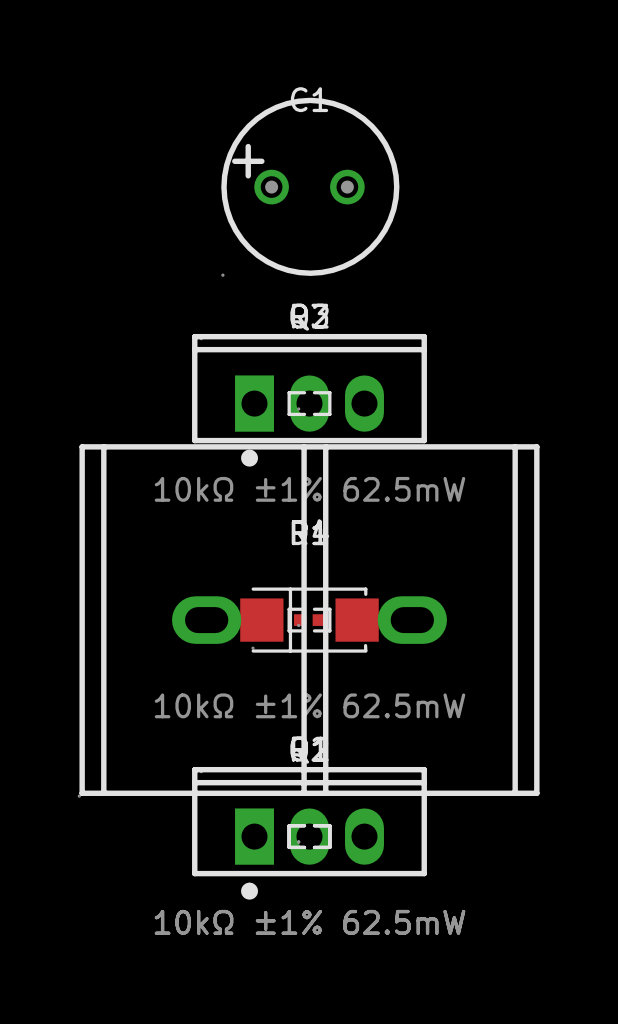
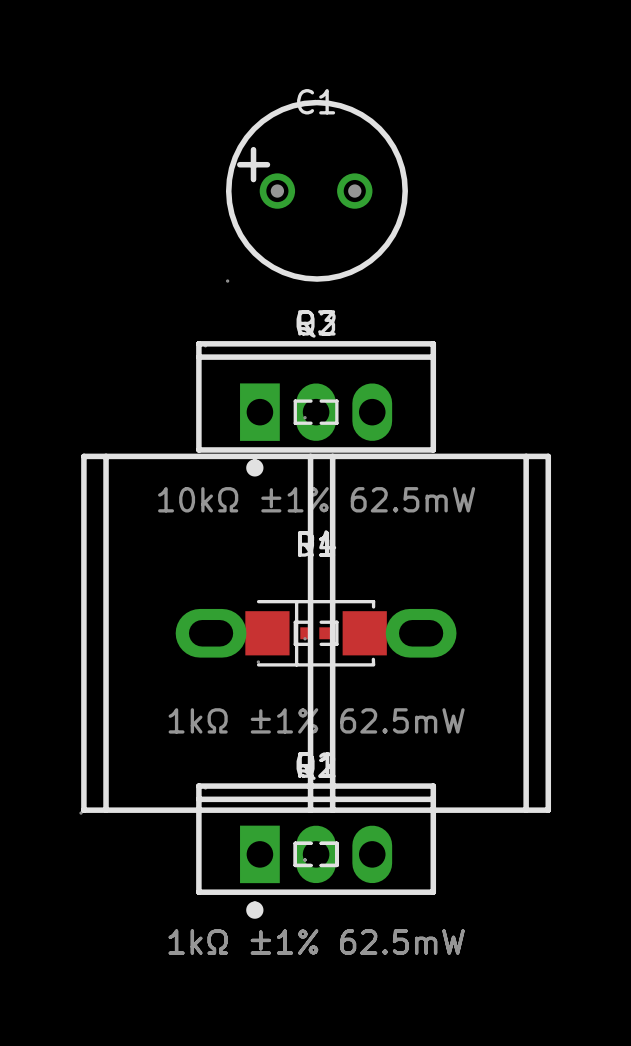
part value: 10kΩ ±1% 62.5mW (310, 705) -> 1kΩ ±1% 62.5mW (316, 720)
part value: 10kΩ ±1% 62.5mW (310, 922) -> 1kΩ ±1% 62.5mW (316, 942)
part value: 10kΩ ±1% 62.5mW (310, 922) -> 1kΩ ±1% 62.5mW (316, 942)

